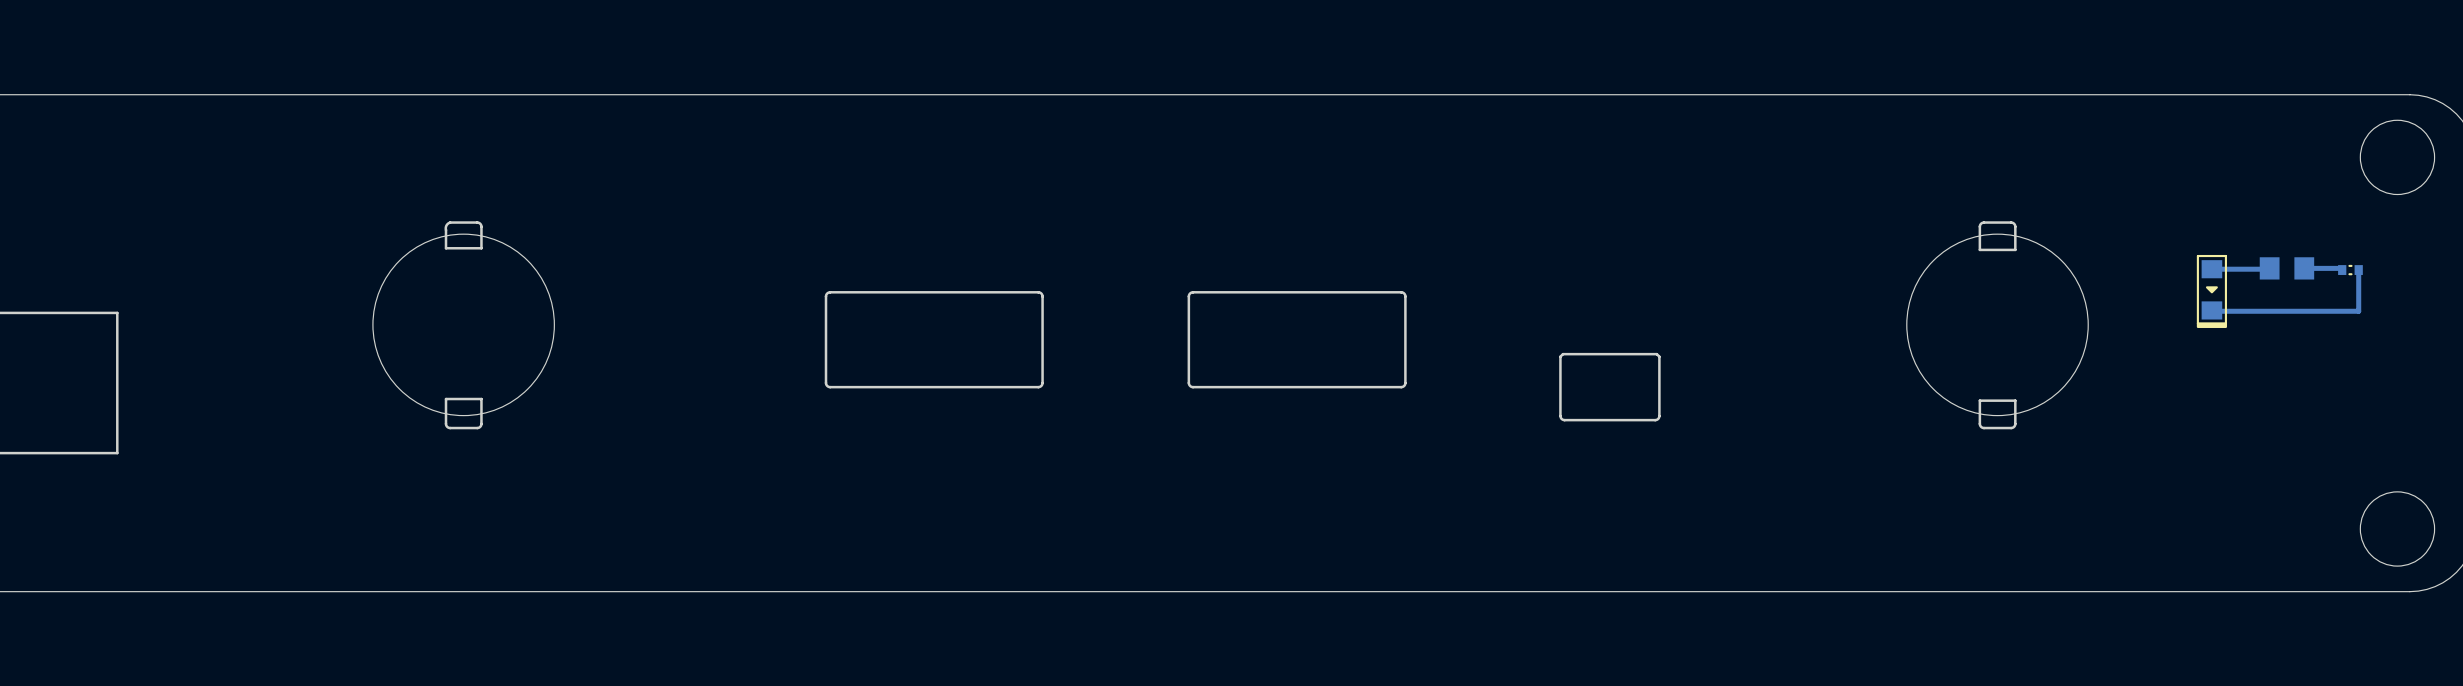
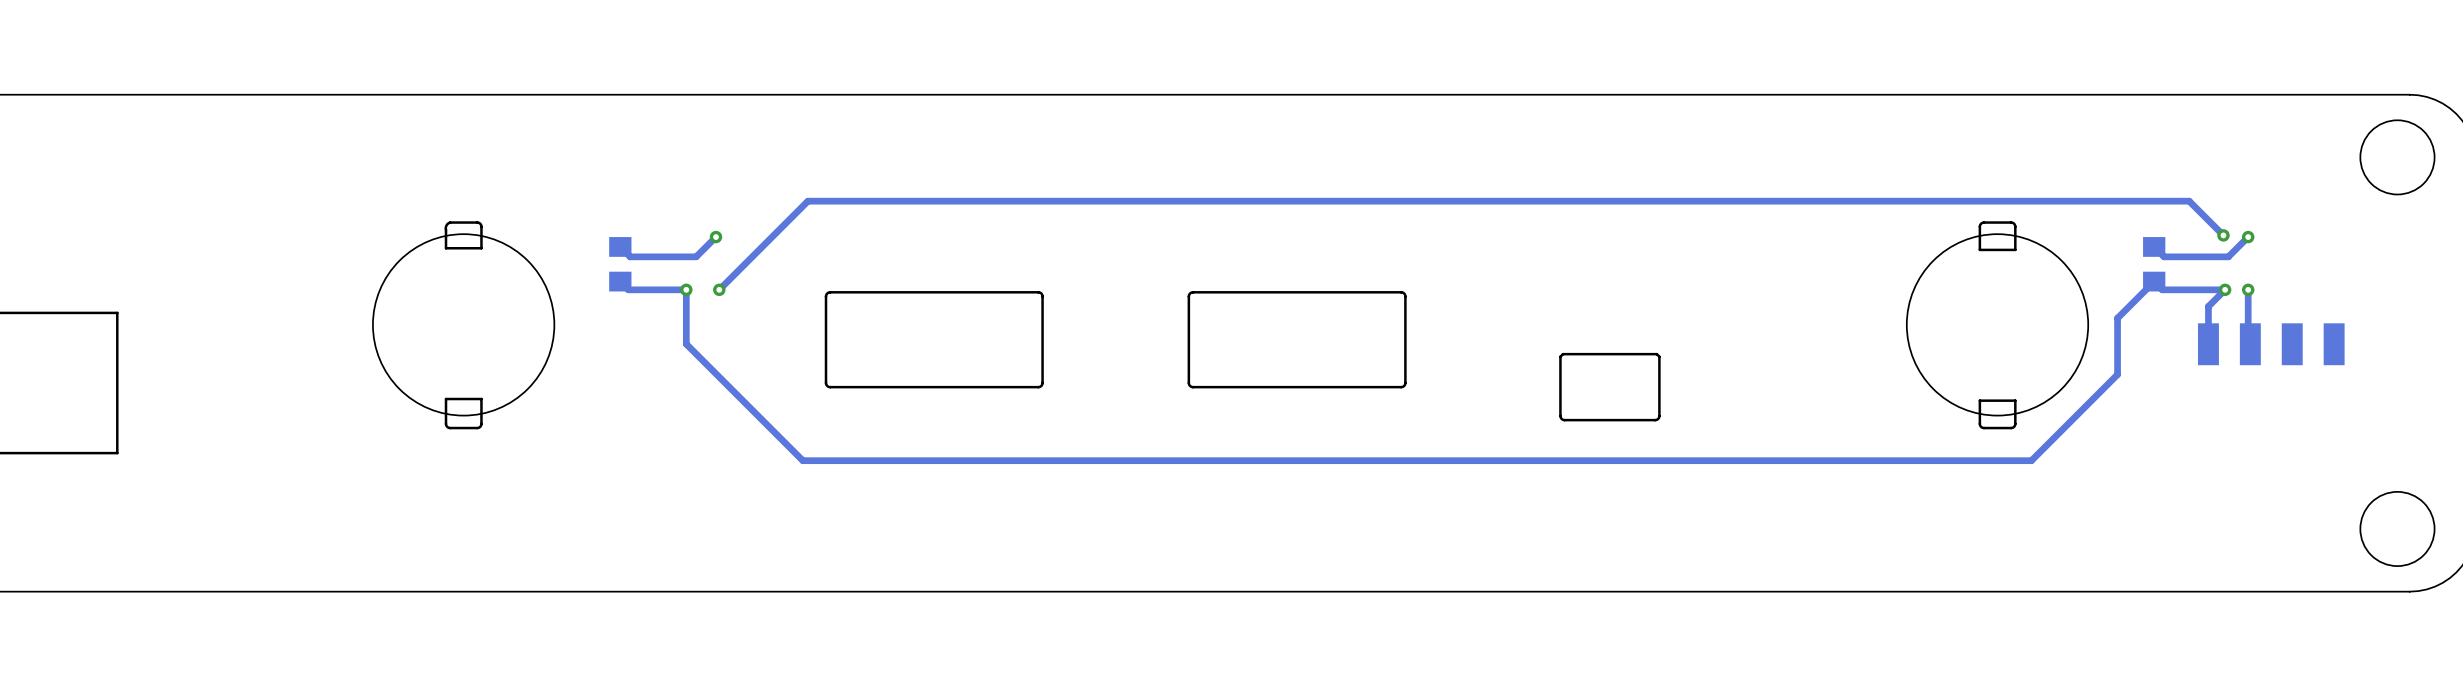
track: none -> (2223, 235) (2189, 201) (807, 201) (719, 289)
via: none -> (2223, 235)
track: none -> (715, 237) (696, 256) (630, 256) (620, 246)
via: none -> (715, 237)
track: none -> (2248, 237) (2228, 256) (2164, 256) (2154, 246)
via: none -> (2248, 237)
part: none -> (620, 264)
track: (2269, 268) (2211, 269) -> none
part rotation: 0° (2286, 268) -> 90° clockwise (2154, 264)
part position: (2286, 268) -> (2154, 264)
track: (2304, 268) (2340, 268) (2342, 270) -> none
part: (2350, 270) -> none
track: (2358, 270) (2358, 311) (2211, 310) -> none
track: none -> (620, 281) (628, 289) (686, 289) (686, 344) (802, 460) (2031, 460) (2117, 374) (2117, 318) (2154, 281) (2162, 289) (2225, 289) (2208, 306) (2208, 344)
via: none -> (686, 289)
via: none -> (719, 289)
via: none -> (2225, 289)
track: none -> (2248, 289) (2248, 342) (2250, 344)
via: none -> (2248, 289)
part: (2211, 291) -> none
part: none -> (2271, 344)

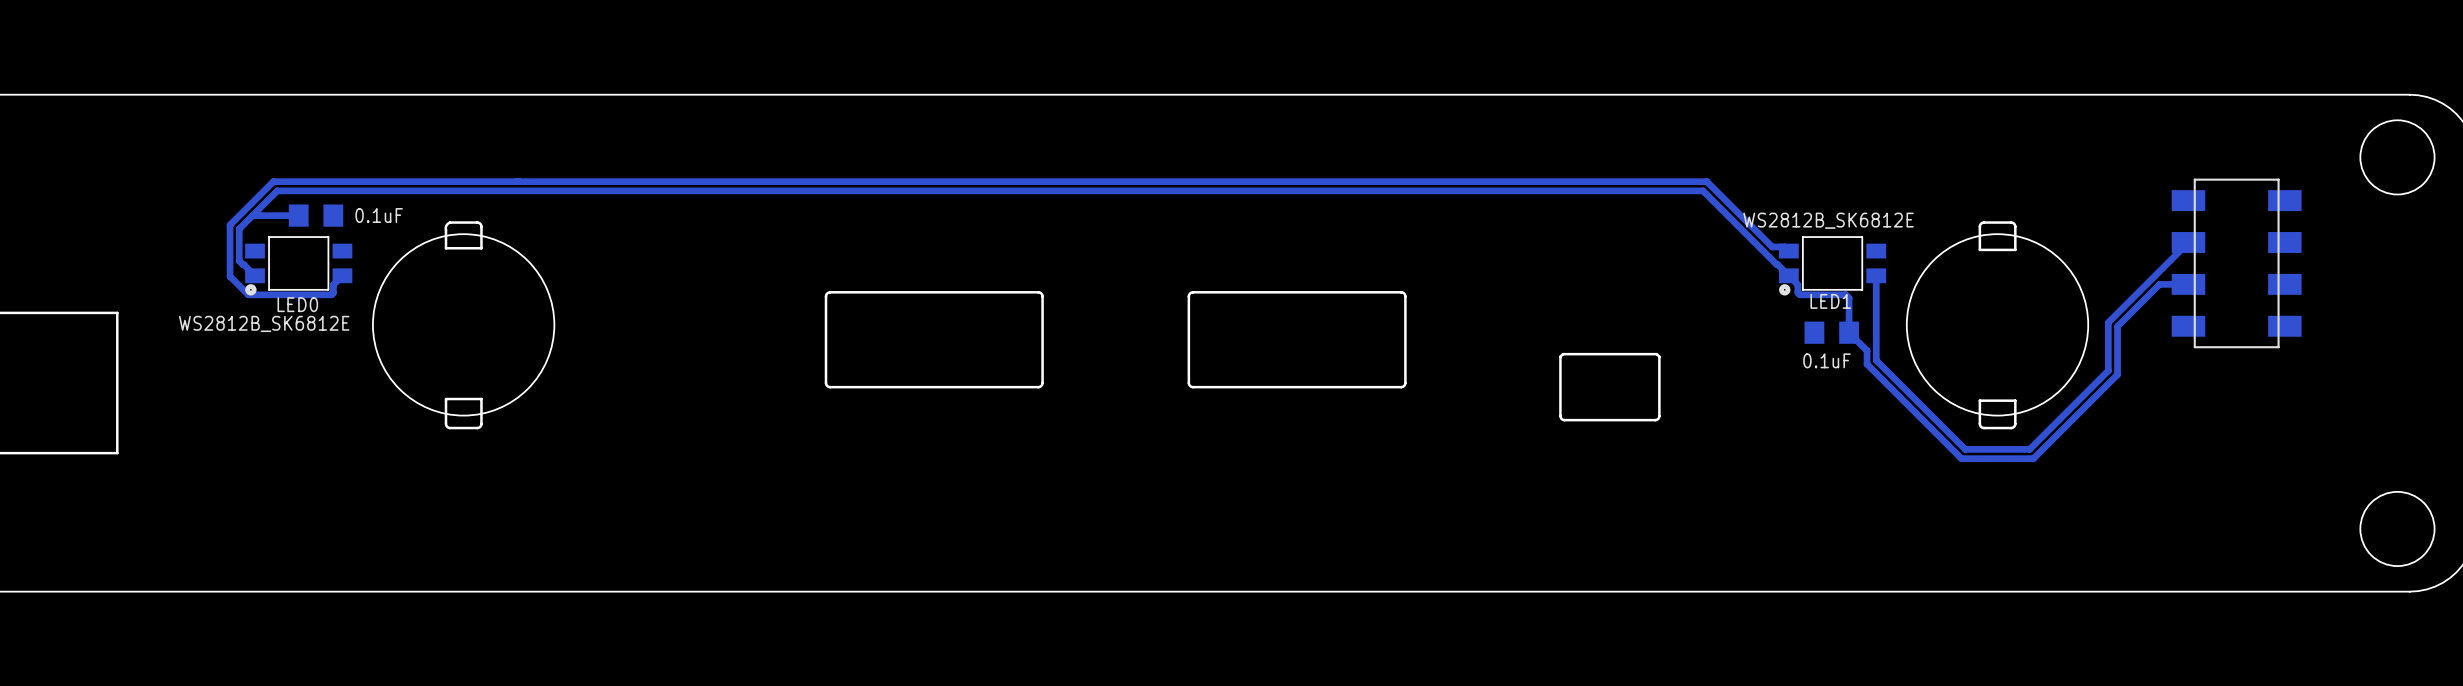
track: none -> (298, 215) (252, 215)
part: none -> 0.1uF (316, 215)
track: (2223, 235) (2189, 201) (807, 201) (719, 289) -> none
via: (2223, 235) -> none
track: (715, 237) (696, 256) (630, 256) (620, 246) -> none
via: (715, 237) -> none
track: (2248, 237) (2228, 256) (2164, 256) (2154, 246) -> none
via: (2248, 237) -> none
track: none -> (2188, 242) (2108, 322) (2108, 370) (2029, 449) (1965, 449) (1876, 360) (1876, 275)
track: none -> (1788, 251) (1784, 246) (1772, 246) (1706, 181) (273, 181) (230, 225) (230, 276) (248, 294) (331, 294) (333, 292) (333, 284) (342, 275)
LED0: none -> WS2812B_SK6812E (298, 263)
LED1: none -> WS2812B_SK6812E (1832, 263)
part: none -> (2236, 263)
part: (620, 264) -> none
part: (2154, 264) -> none
track: (620, 281) (628, 289) (686, 289) (686, 344) (802, 460) (2031, 460) (2033, 458) -> (255, 275) (239, 260) (239, 228) (277, 190) (1703, 190) (1797, 284) (1797, 292) (1799, 294) (1845, 294) (1849, 298) (1849, 332) (1867, 350) (1867, 364) (1961, 458) (2033, 458)
drawing: none -> [245, 284, 257, 296]
drawing: none -> [1779, 284, 1791, 296]
via: (686, 289) -> none
via: (719, 289) -> none
via: (2225, 289) -> none
track: (2248, 289) (2248, 342) (2250, 344) -> none
via: (2248, 289) -> none
track: (2117, 326) (2117, 318) (2154, 281) (2162, 289) (2225, 289) (2208, 306) (2208, 344) -> (2117, 326) (2159, 284) (2188, 284)
part: none -> 0.1uF (1831, 332)
part: (2271, 344) -> none

